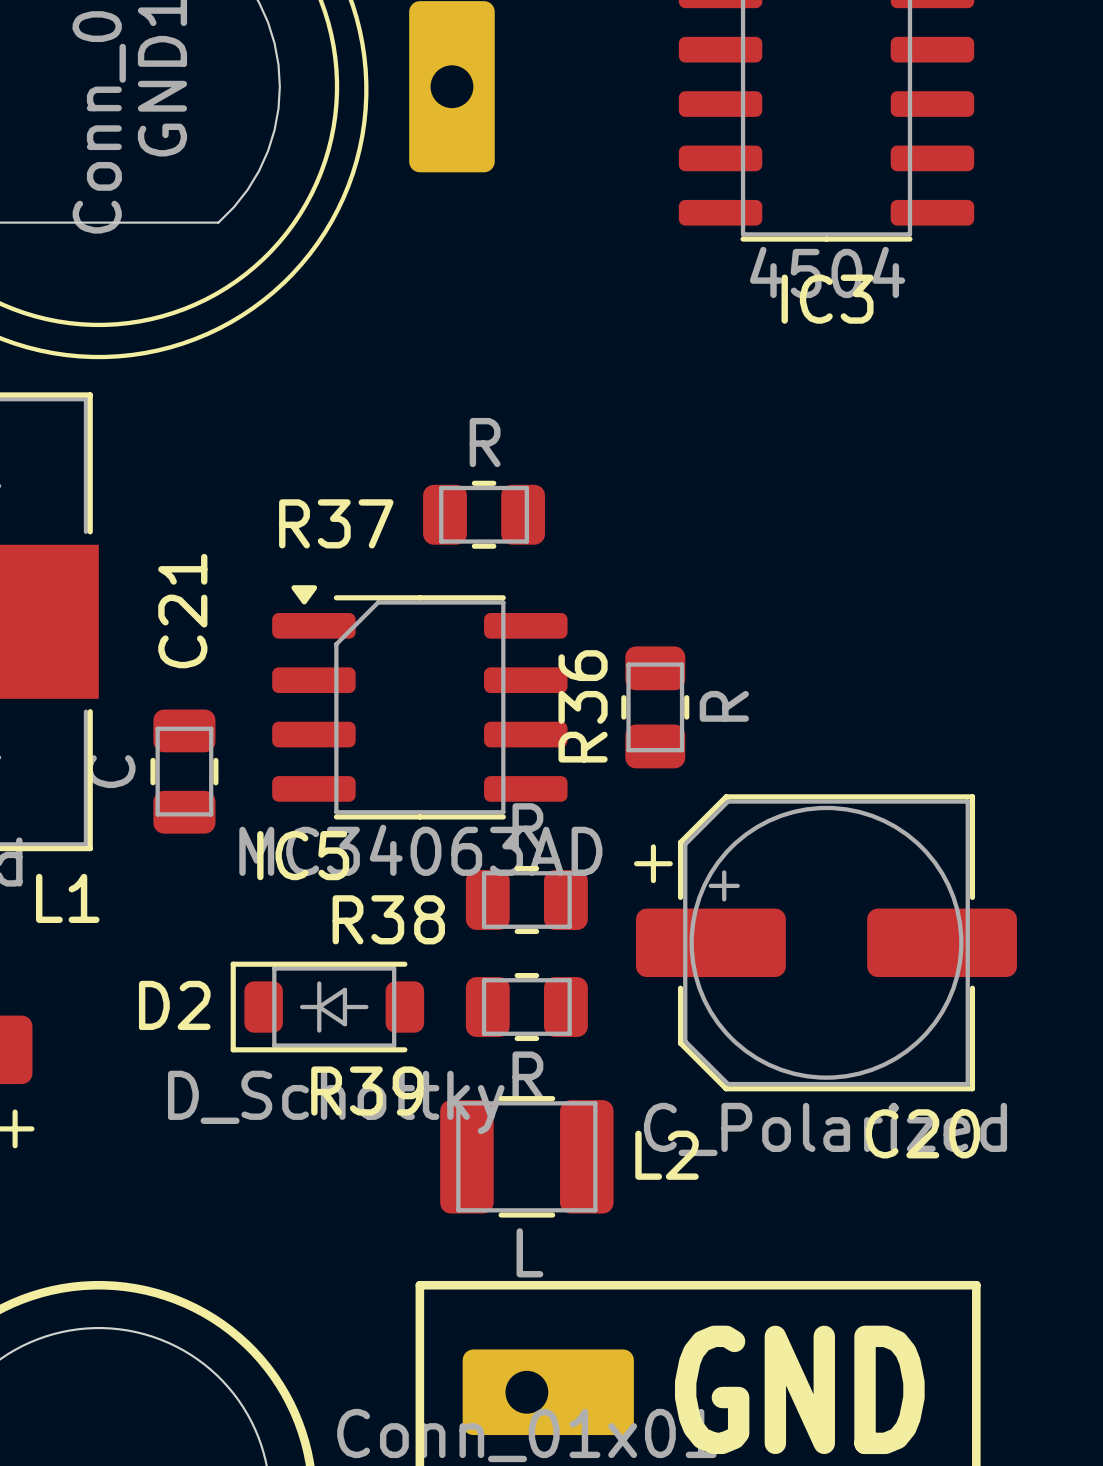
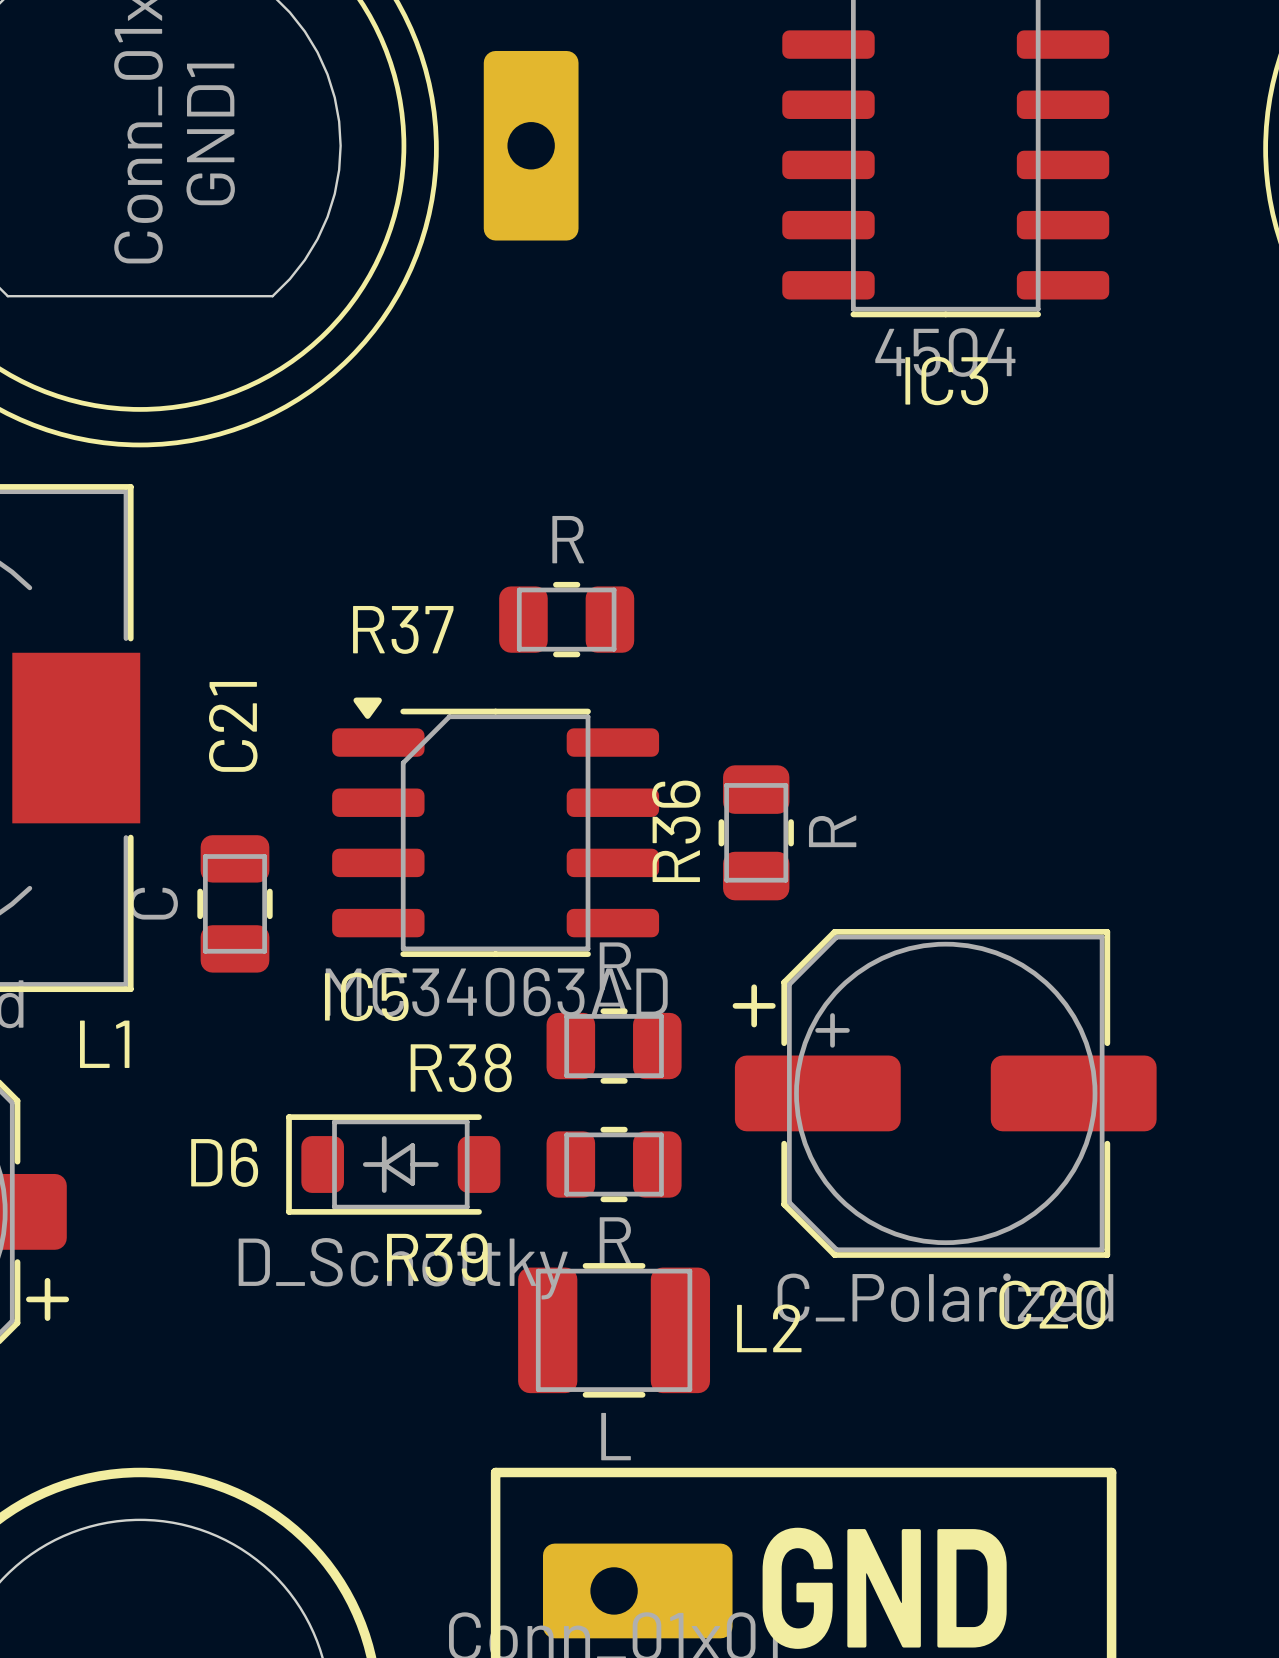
D2 name: D2 (174, 1005) -> D6 (224, 1162)

